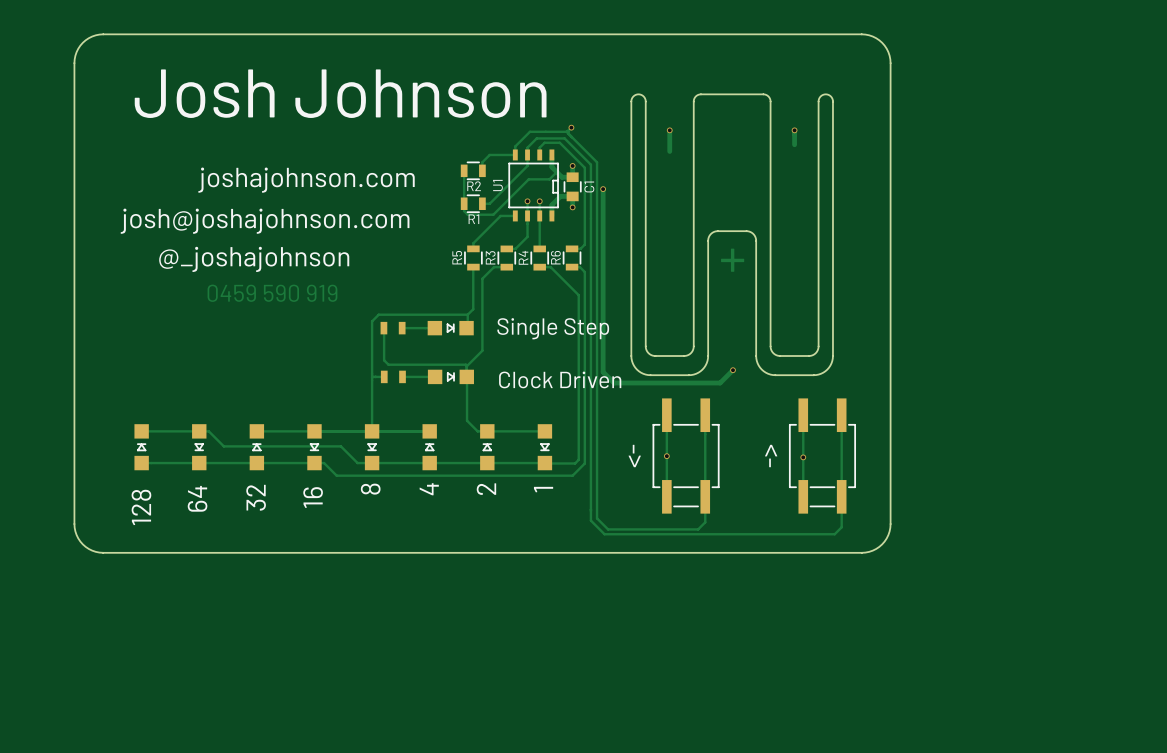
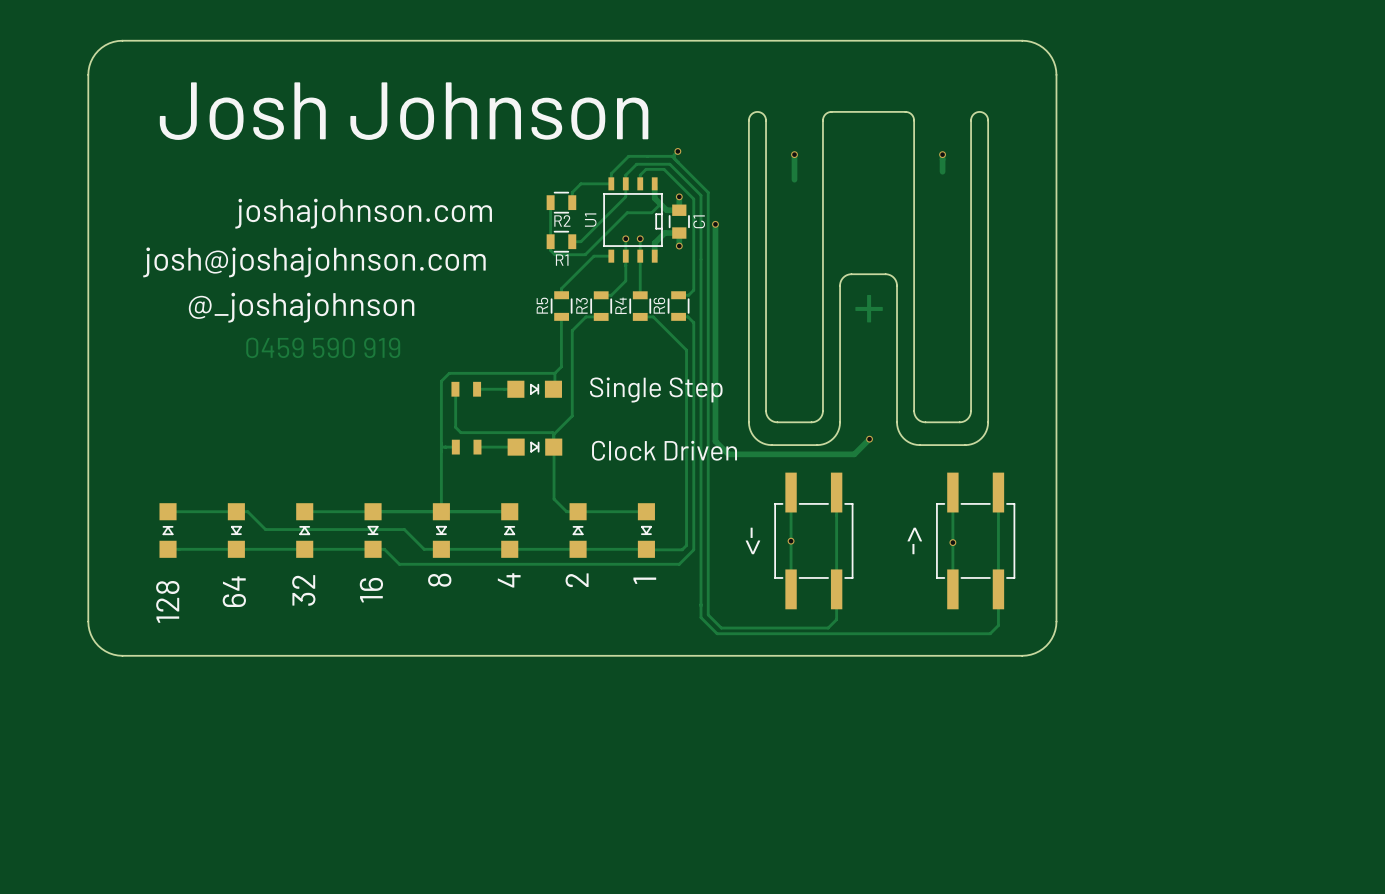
part footprint: [652, 398, 720, 514] -> [774, 472, 854, 610]
part footprint: [789, 398, 856, 514] -> [936, 472, 1016, 610]

